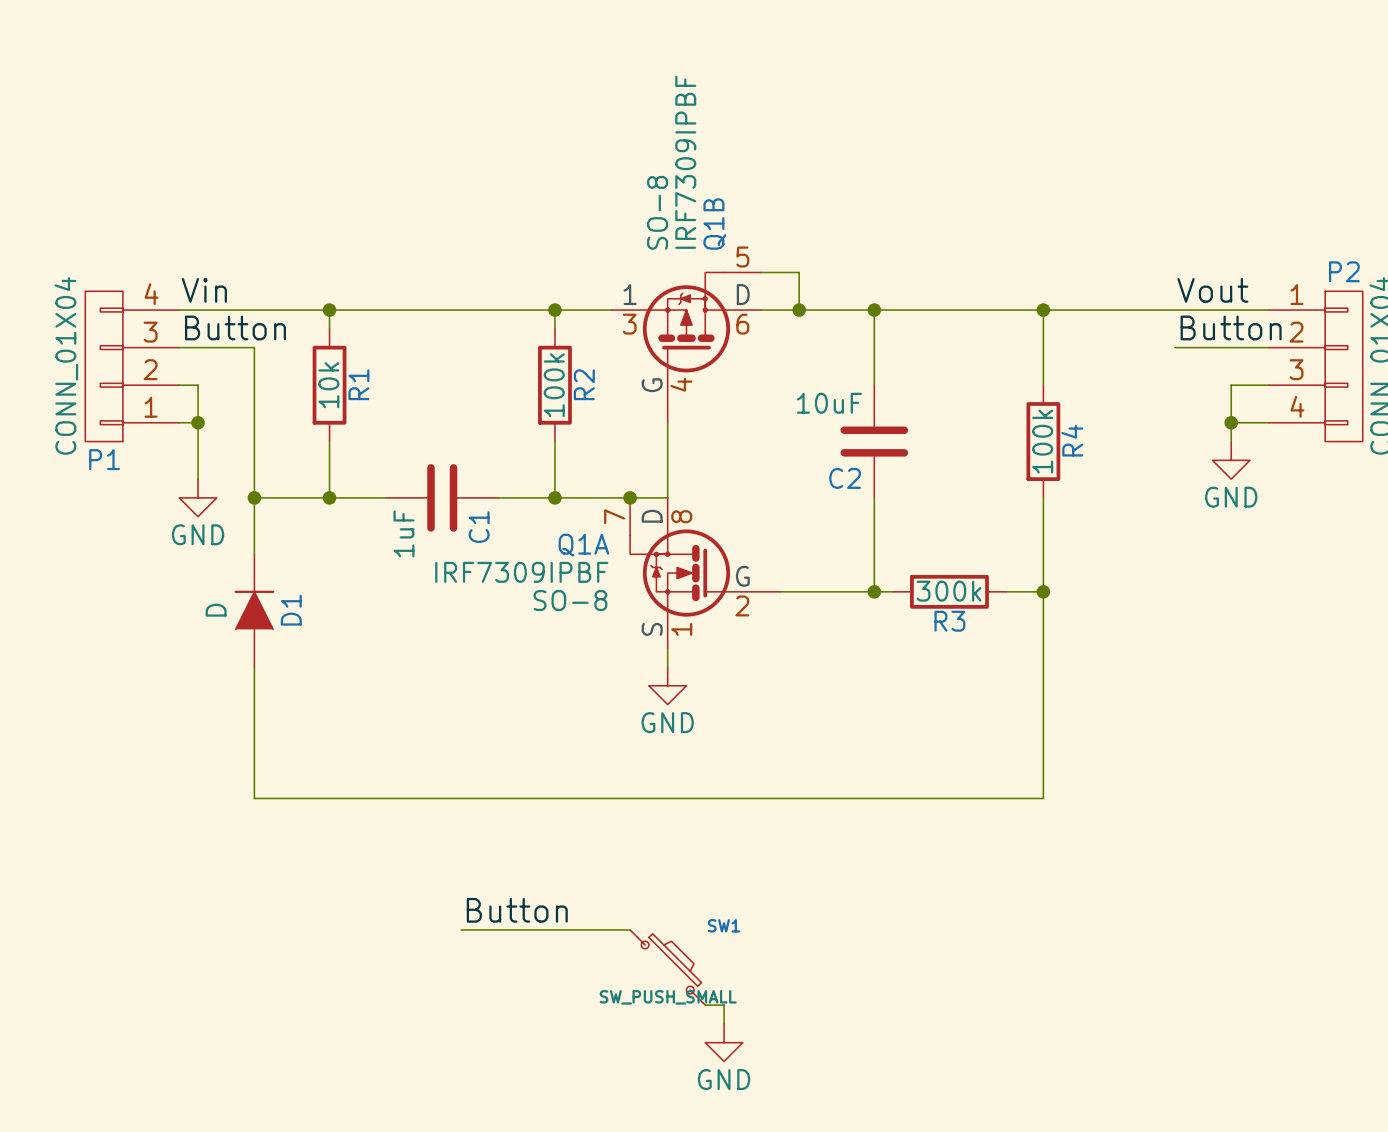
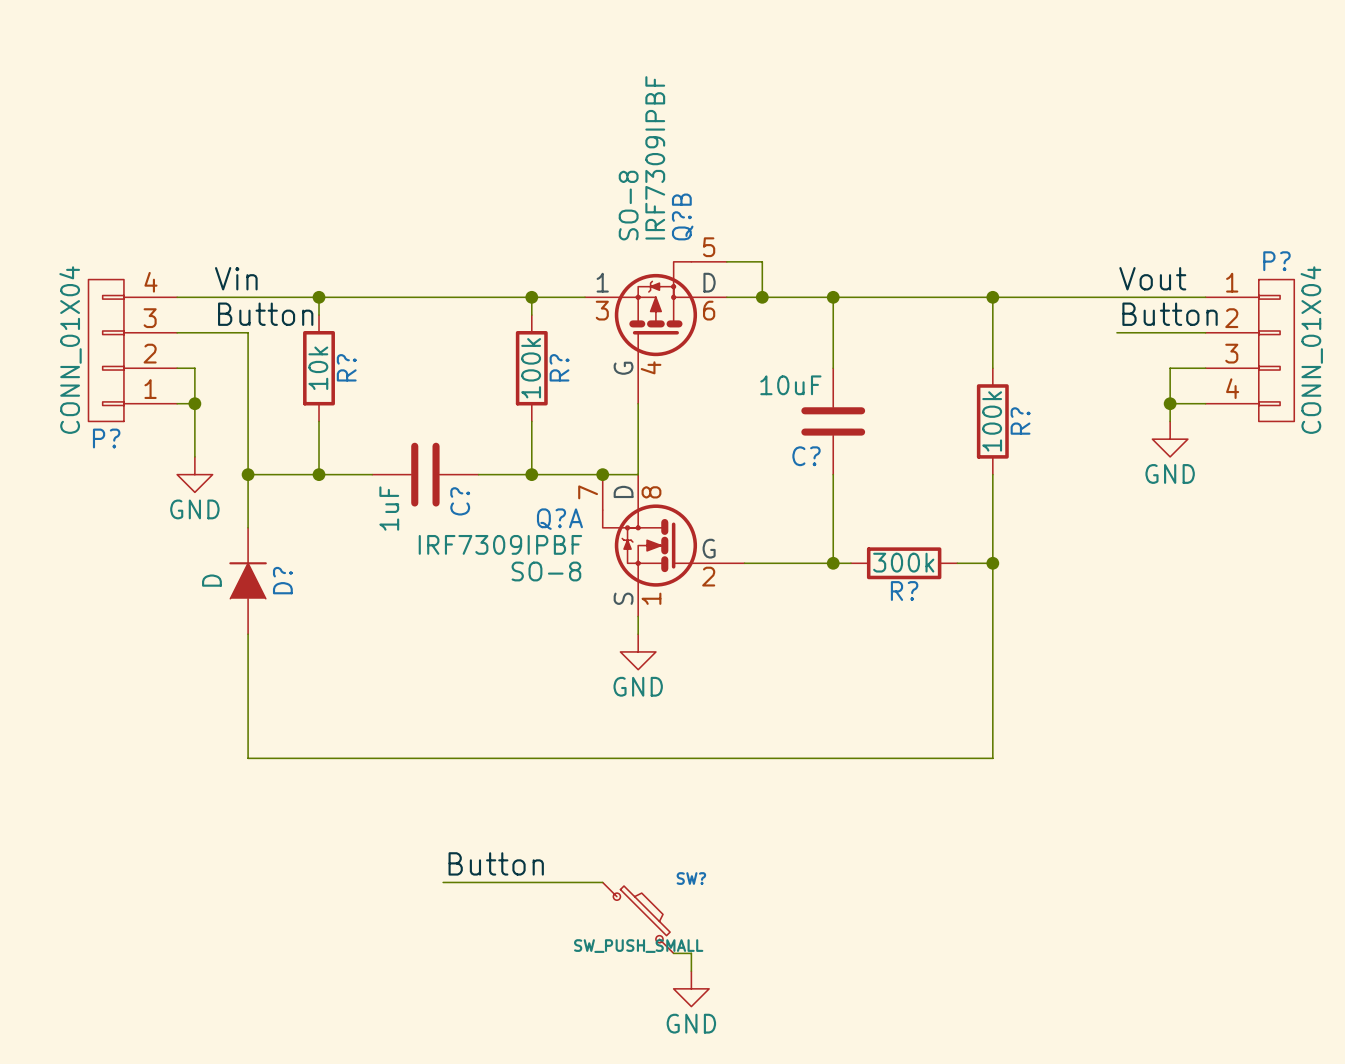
Q1B name: Q1B (714, 224) -> Q?B (682, 216)
P2 name: P2 (1344, 271) -> P? (1276, 261)
label position: Vin (204, 290) -> Vin (236, 278)
label position: Button (235, 327) -> Button (265, 314)
R1 name: R1 (358, 384) -> R? (346, 367)
R2 name: R2 (584, 384) -> R? (559, 367)
R4 name: R4 (1072, 440) -> R? (1020, 421)
P1 name: P1 (104, 459) -> P? (106, 438)
C2 name: C2 (845, 478) -> C? (806, 456)
C1 name: C1 (479, 527) -> C? (460, 501)
Q1A name: Q1A (583, 545) -> Q?A (559, 519)
D1 name: D1 (291, 610) -> D? (282, 580)
R3 name: R3 (949, 621) -> R? (904, 591)
SW1 name: SW1 (724, 925) -> SW? (691, 878)

